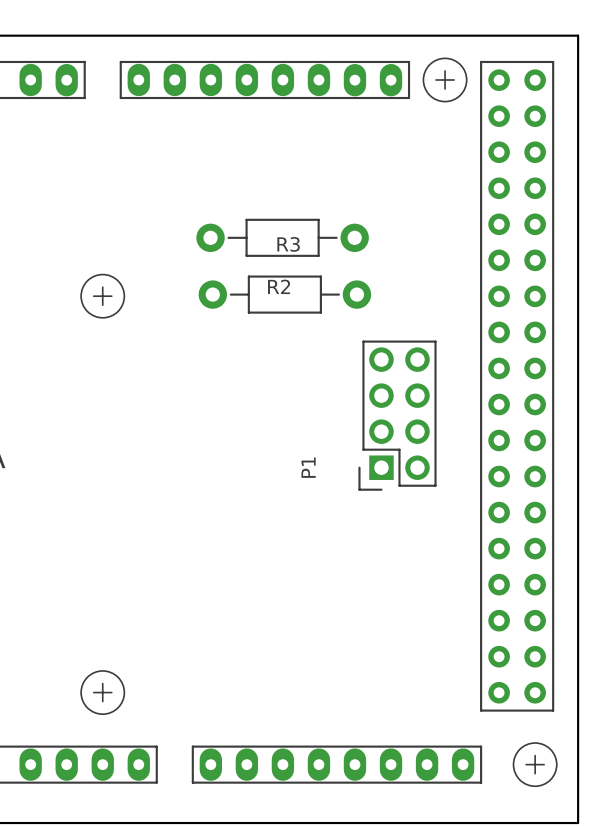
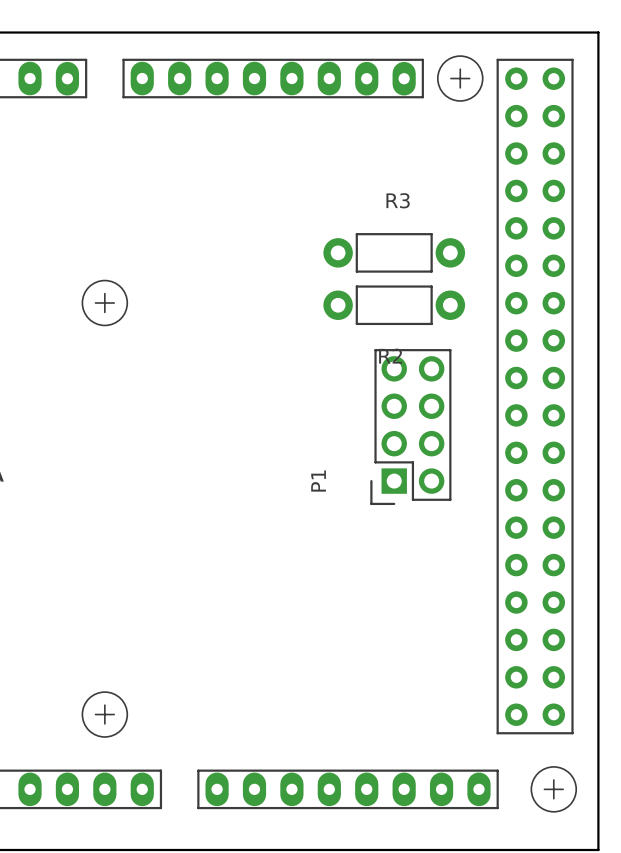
R2 footprint: [196, 218, 369, 257] -> [323, 285, 466, 326]
R3 footprint: [198, 275, 372, 314] -> [323, 233, 466, 273]

